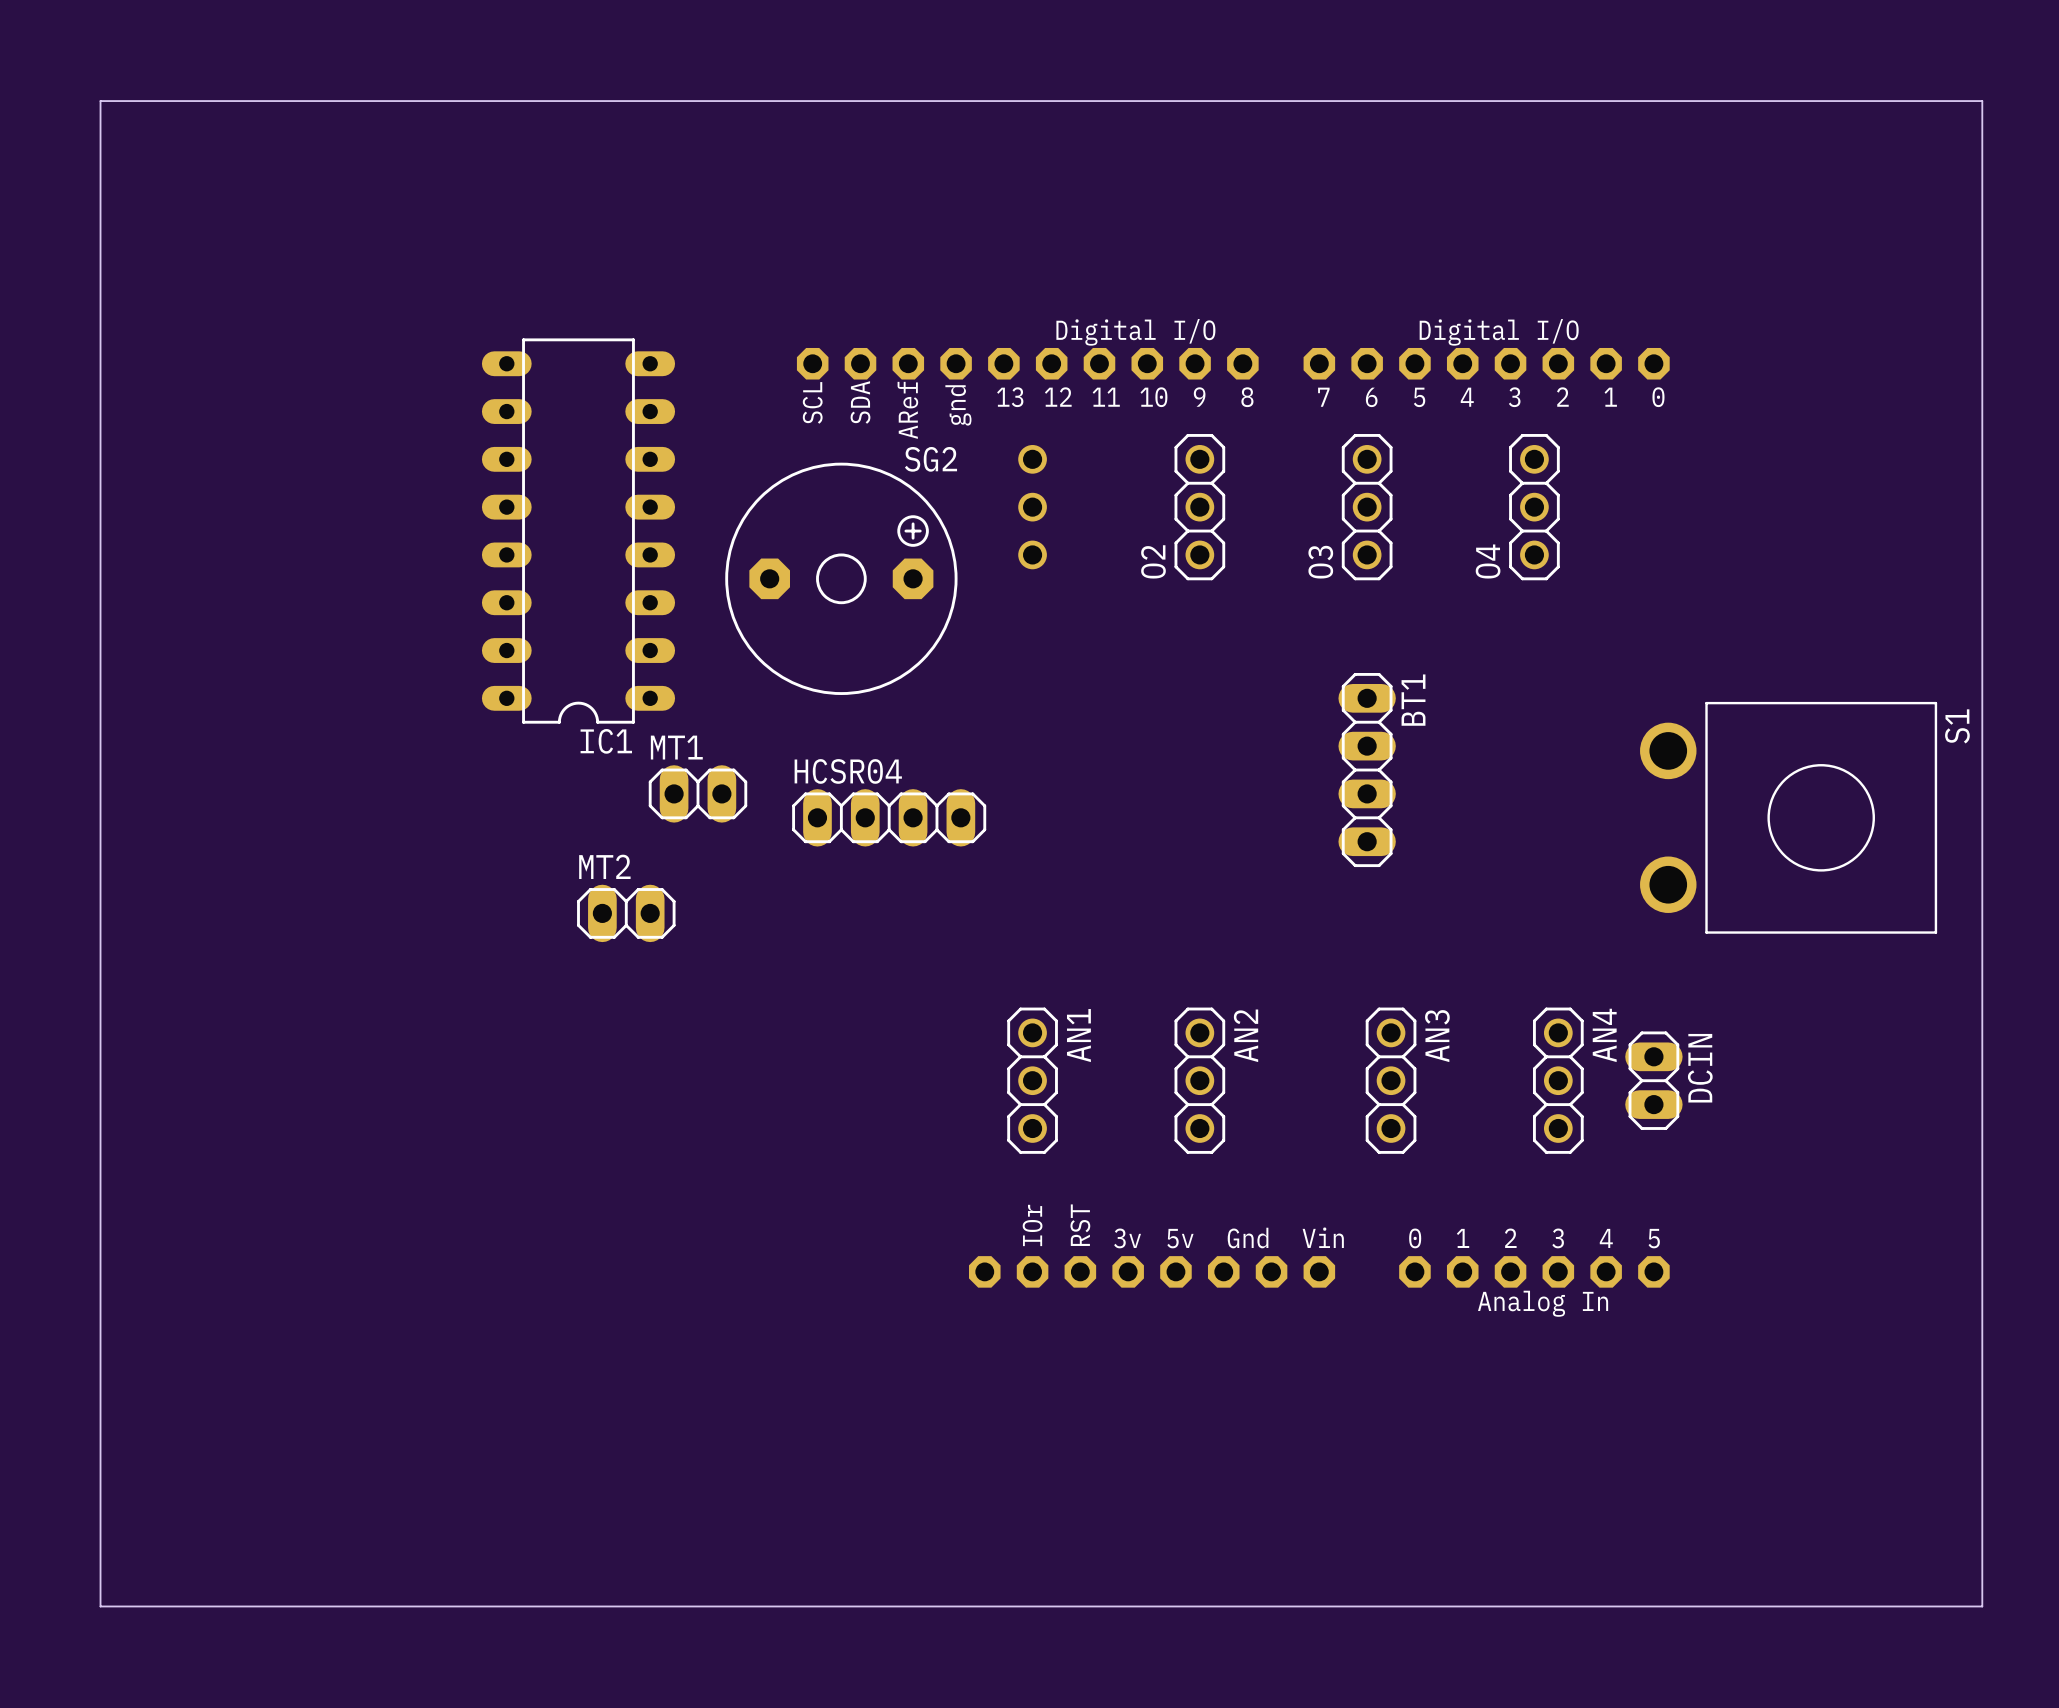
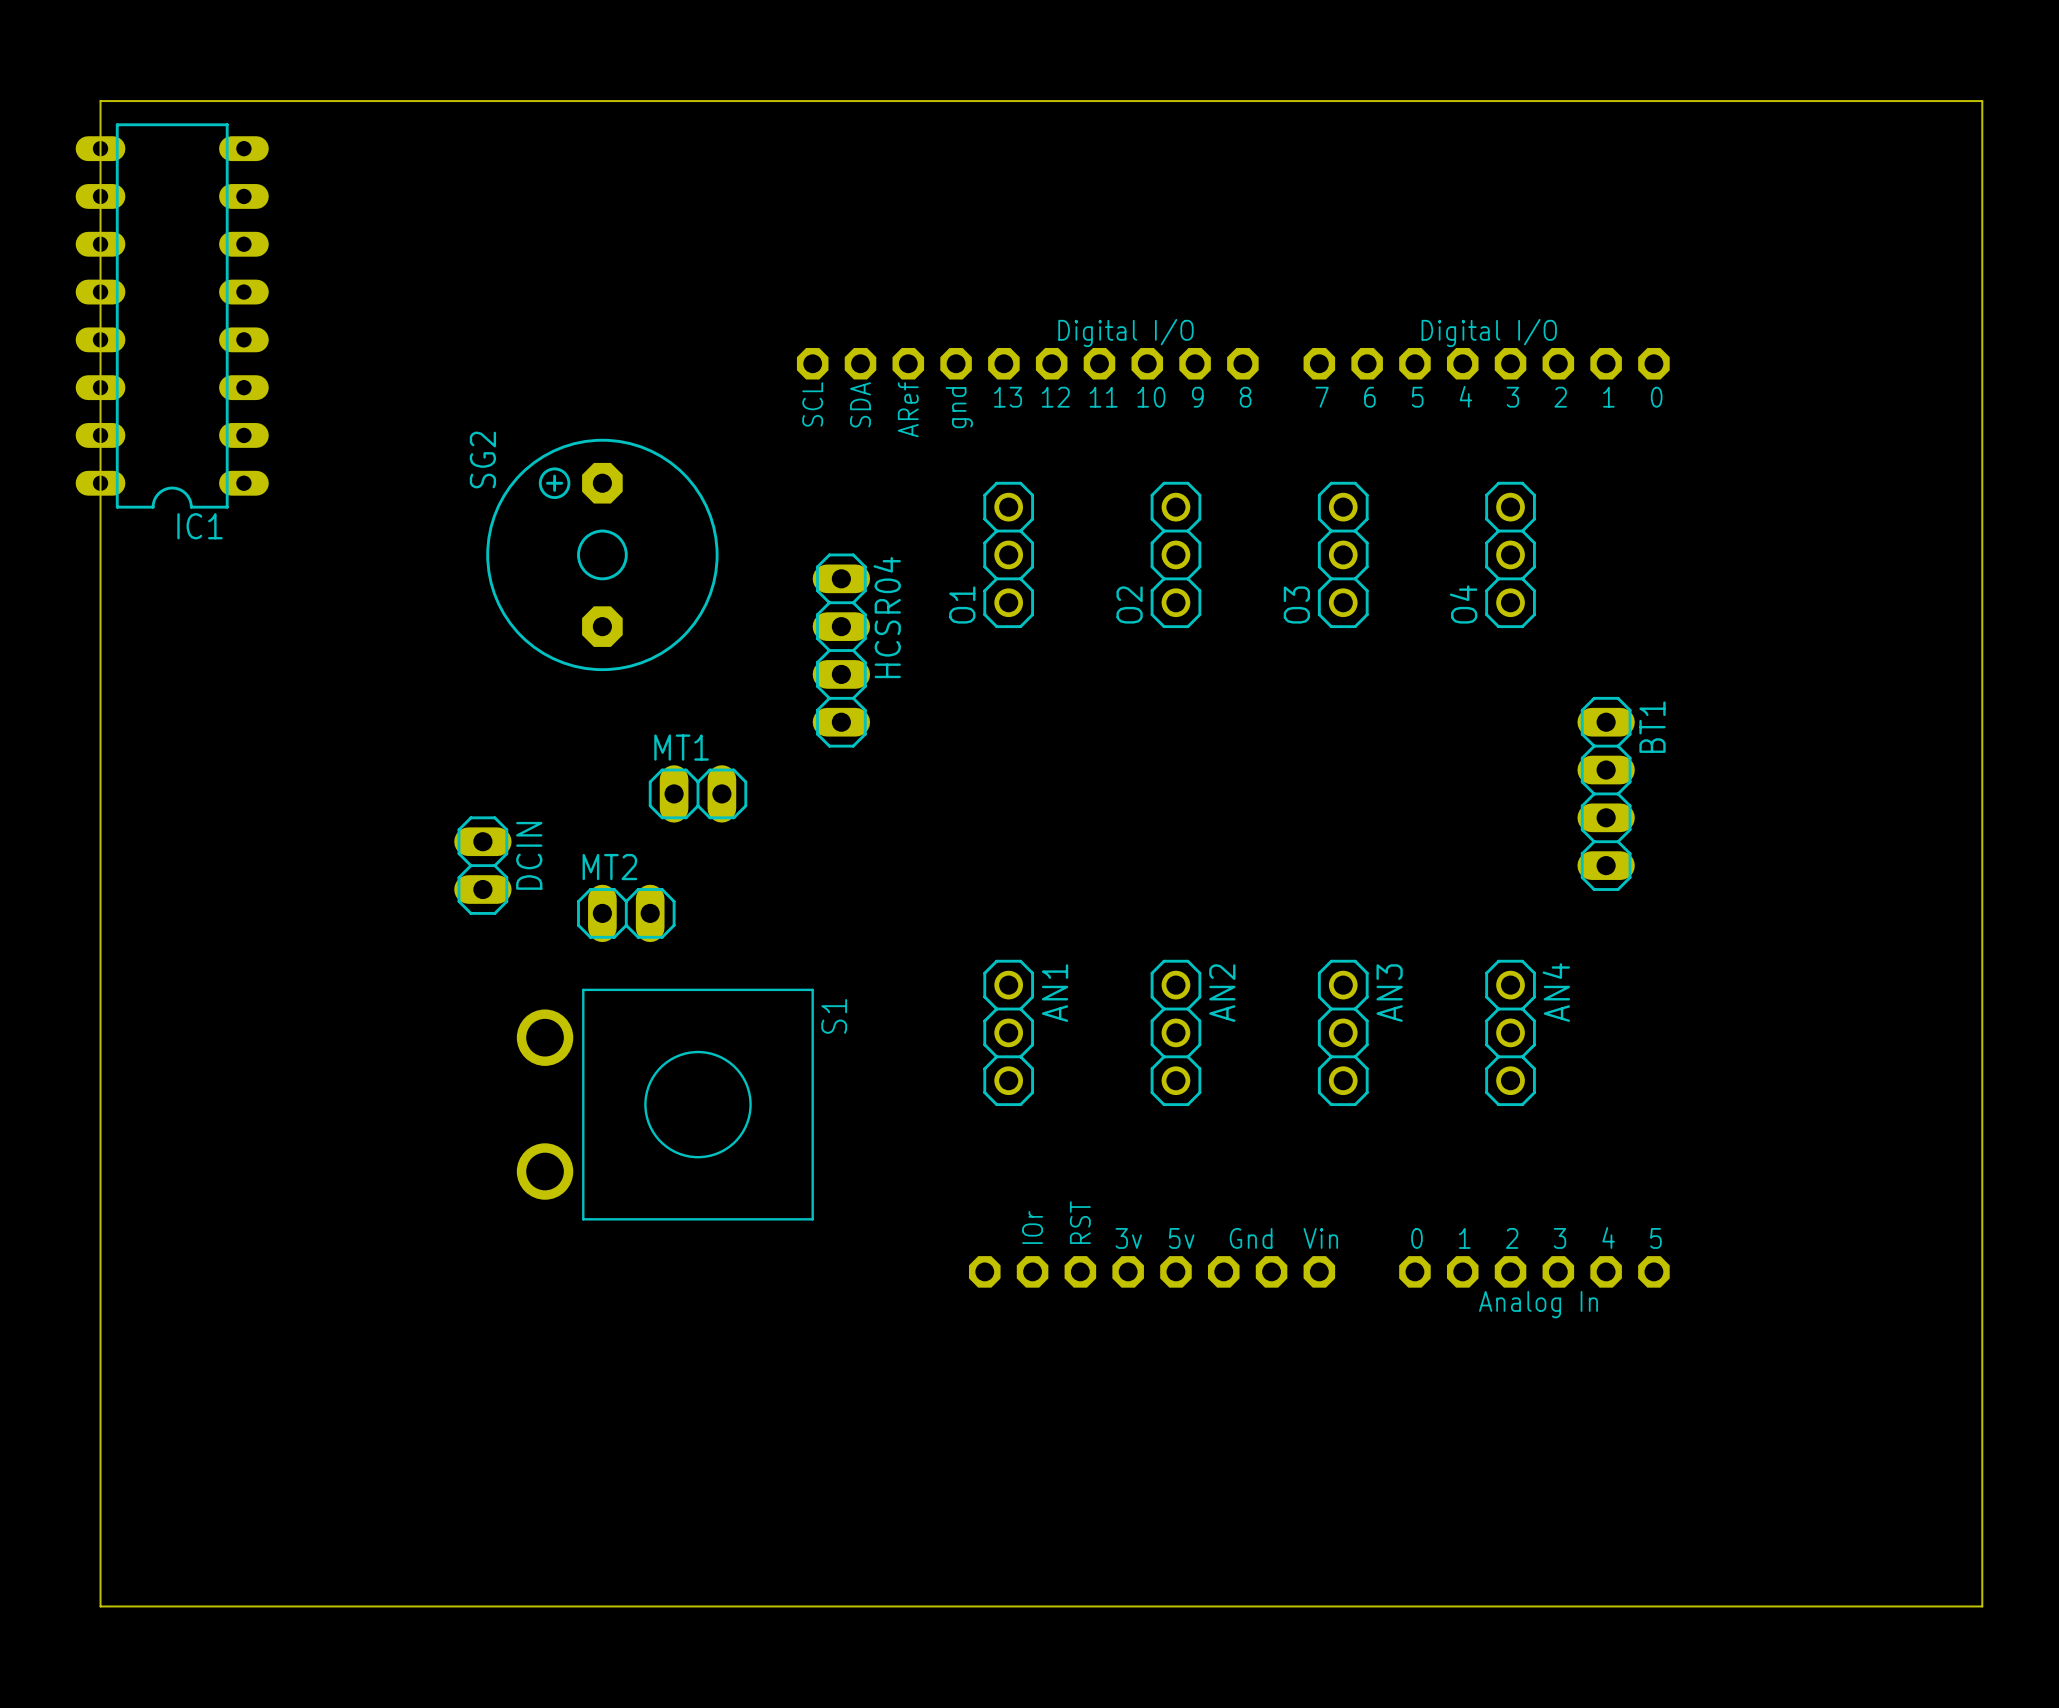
O1 side: bottom (1032, 507) -> top (1008, 554)
O2 position: (1199, 507) -> (1175, 554)
O3 position: (1367, 507) -> (1343, 554)
O4 position: (1534, 507) -> (1510, 554)
IC1 position: (578, 531) -> (172, 315)
SG2 rotation: 0° (841, 578) -> 90° counterclockwise (602, 554)
SG2 position: (841, 578) -> (602, 554)
BT1 position: (1367, 770) -> (1606, 793)
HCSR04 rotation: 0° (889, 817) -> 90° clockwise (841, 650)
HCSR04 position: (889, 817) -> (841, 650)
S1 position: (1788, 817) -> (665, 1104)
DCIN: none -> (482, 865)
AN1 position: (1032, 1080) -> (1008, 1032)
AN2 position: (1199, 1080) -> (1175, 1032)
AN3 position: (1391, 1080) -> (1343, 1032)
AN4 position: (1558, 1080) -> (1510, 1032)
DCIN: (1653, 1080) -> none

